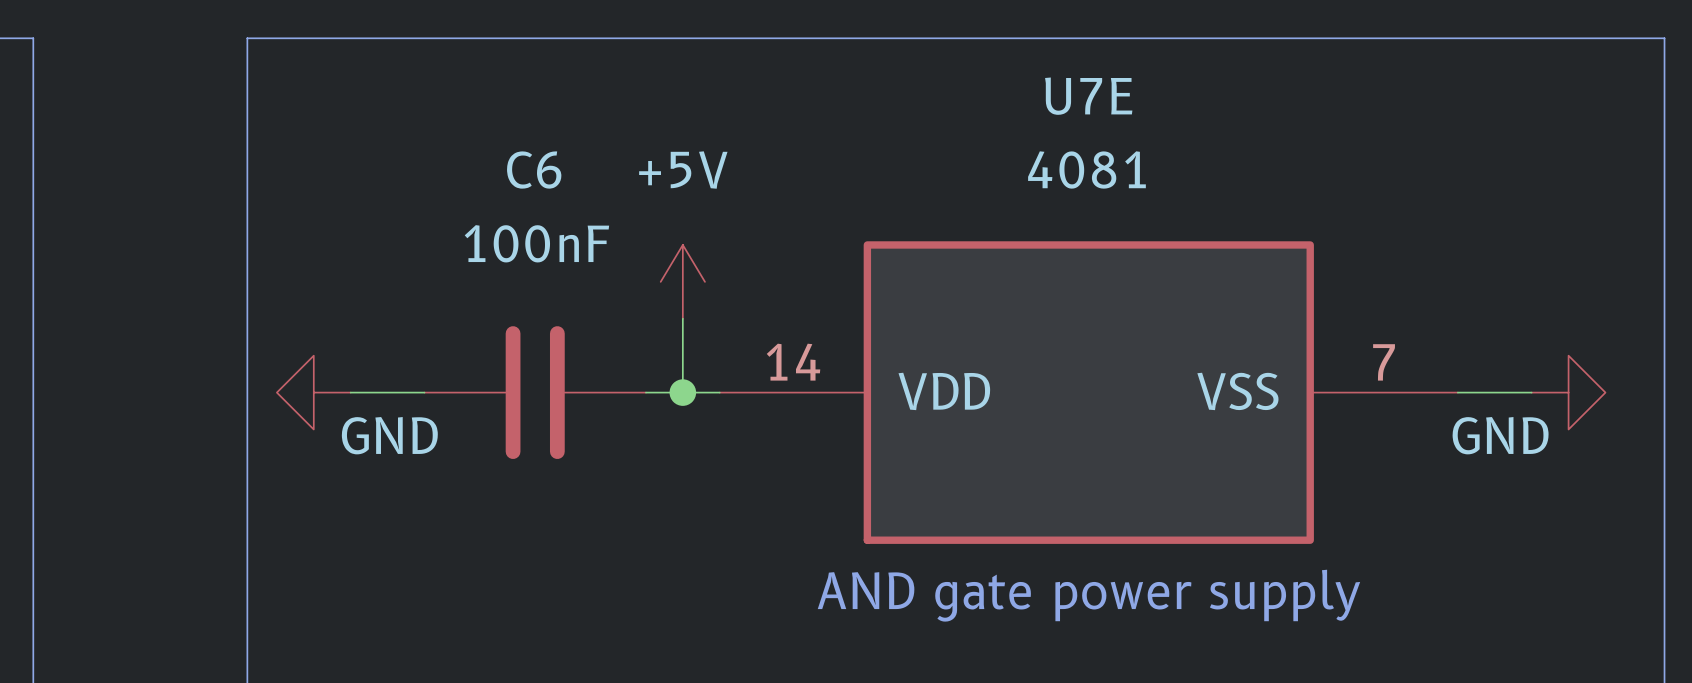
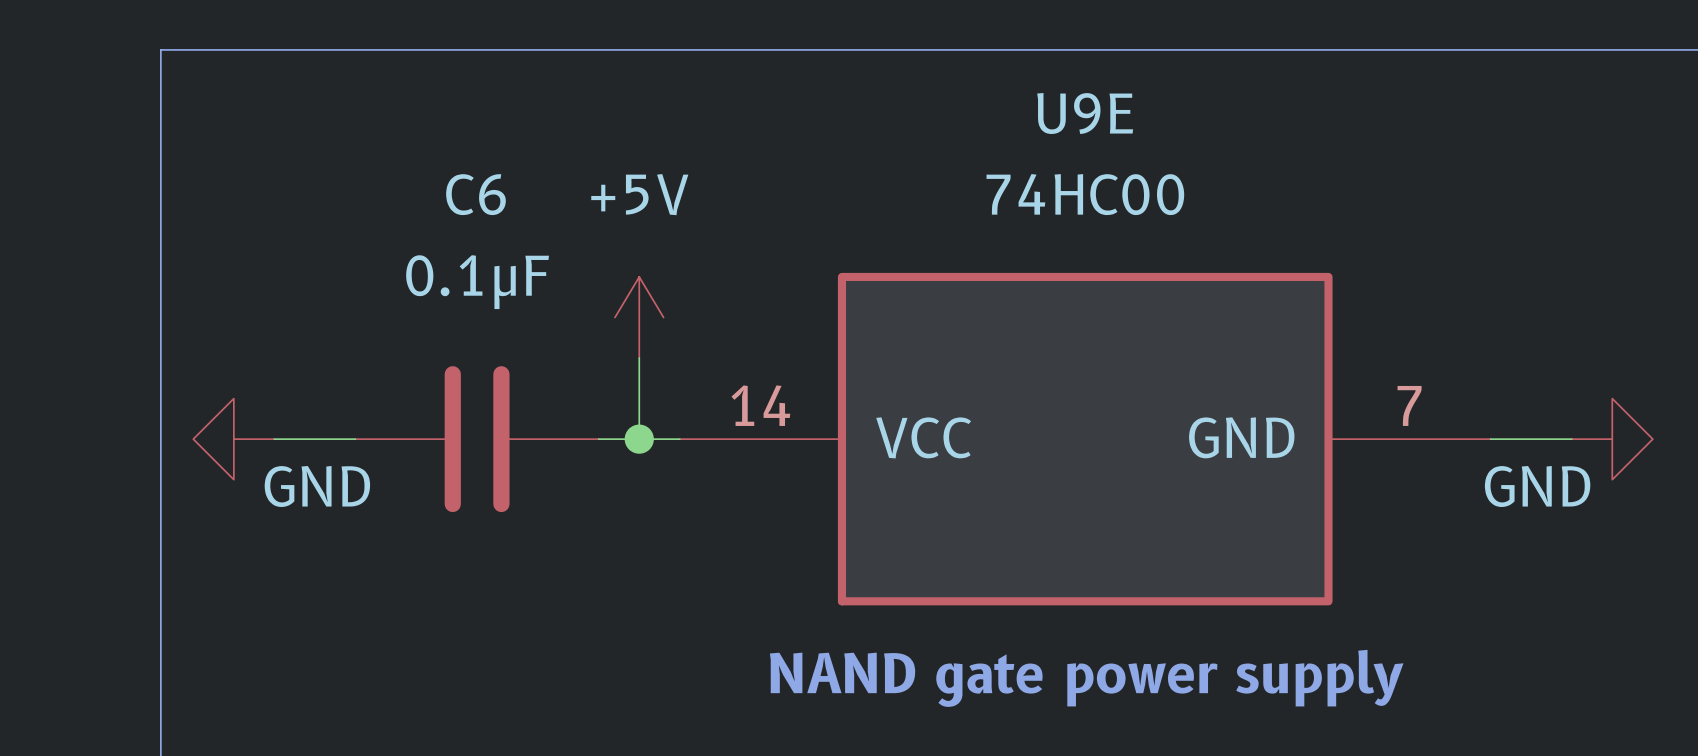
U7E name: U7E (1088, 96) -> U9E (1085, 113)
U7E value: 4081 (1086, 169) -> 74HC00 (1085, 194)
C6 value: 100nF (536, 243) -> 0.1μF (477, 282)
U7E pin name: VDD (944, 391) -> VCC (923, 437)
U7E pin name: VSS (1237, 391) -> GND (1241, 437)
text: AND gate power supply (1088, 595) -> NAND gate power supply (1086, 678)

